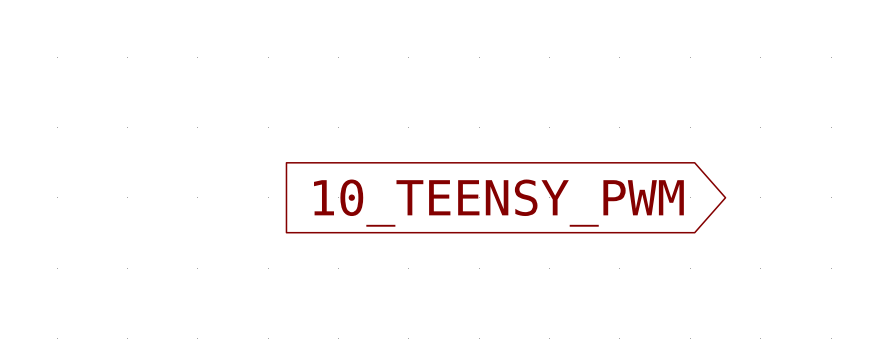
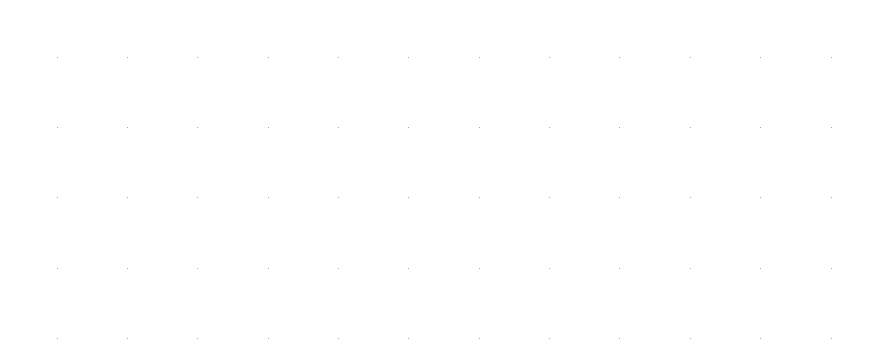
global label: 10_TEENSY_PWM (498, 203) -> none

